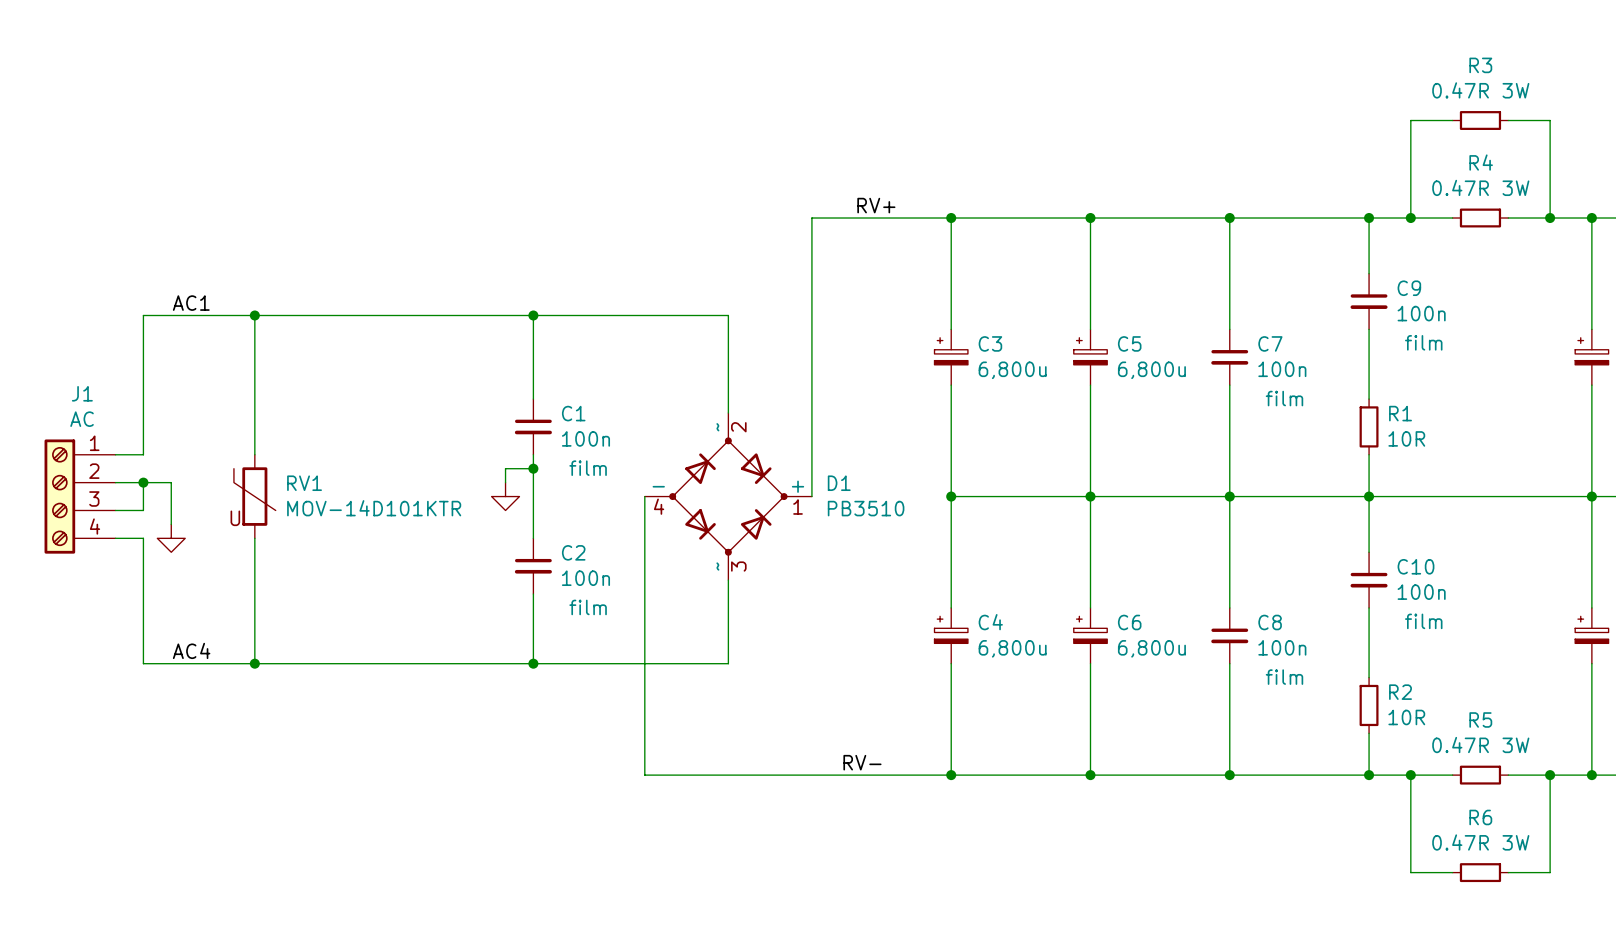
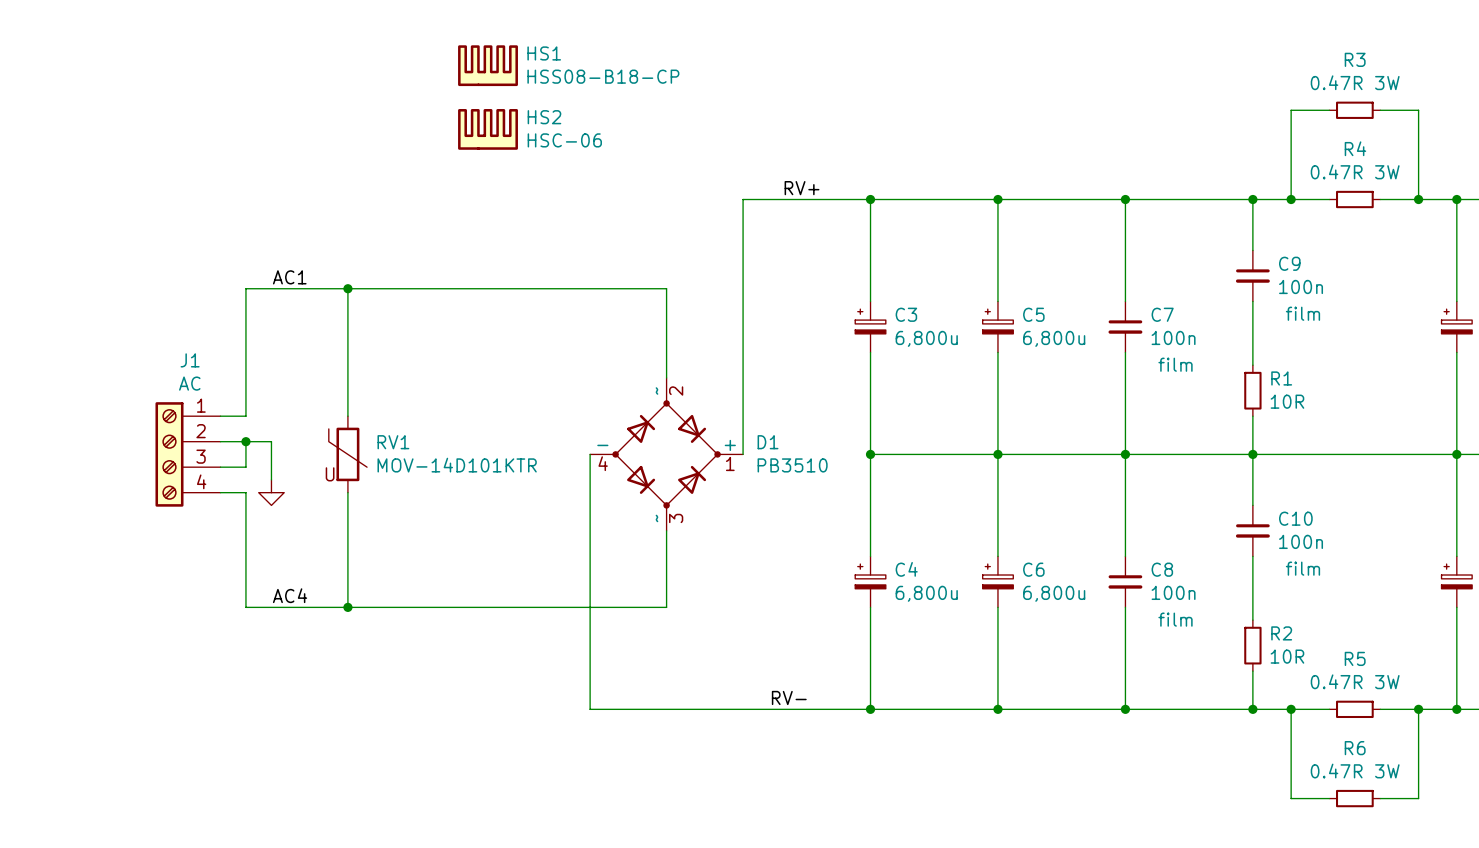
HS1: none -> HSS08-B18-CP (488, 65)
HS2: none -> HSC-06 (488, 129)
label position: AC1 (191, 303) -> AC1 (289, 277)
wire: (254, 315) (254, 454) -> (347, 288) (347, 416)
junction: (254, 315) -> none
wire: (268, 315) (143, 315) (143, 454) (115, 454) -> (245, 288) (245, 416) (220, 416)
junction: none -> (347, 288)
wire: (533, 315) (533, 399) -> none
junction: (533, 315) -> none
C1: 100n (533, 426) -> none
wire: (533, 454) (533, 538) -> none
wire: (533, 468) (505, 468) (505, 482) -> none
junction: (533, 468) -> none
wire: (115, 482) (171, 482) (171, 524) -> (220, 441) (271, 441) (271, 479)
wire: (143, 482) (143, 510) (115, 510) -> (245, 441) (245, 467) (220, 467)
junction: (143, 482) -> none
junction: none -> (245, 441)
J1 position: (80, 496) -> (187, 454)
RV1 position: (254, 496) -> (347, 454)
power symbol: (505, 496) -> none
wire: (115, 538) (143, 538) (143, 663) (268, 663) -> (220, 492) (245, 492) (245, 607)
power symbol: (171, 538) -> none
wire: (254, 538) (254, 663) -> (347, 492) (347, 607)
power symbol: none -> (271, 492)
C2: 100n (533, 566) -> none
wire: (533, 594) (533, 663) -> none
label position: AC4 (191, 650) -> AC4 (290, 595)
junction: (254, 663) -> none
junction: none -> (347, 607)
junction: (533, 663) -> none

